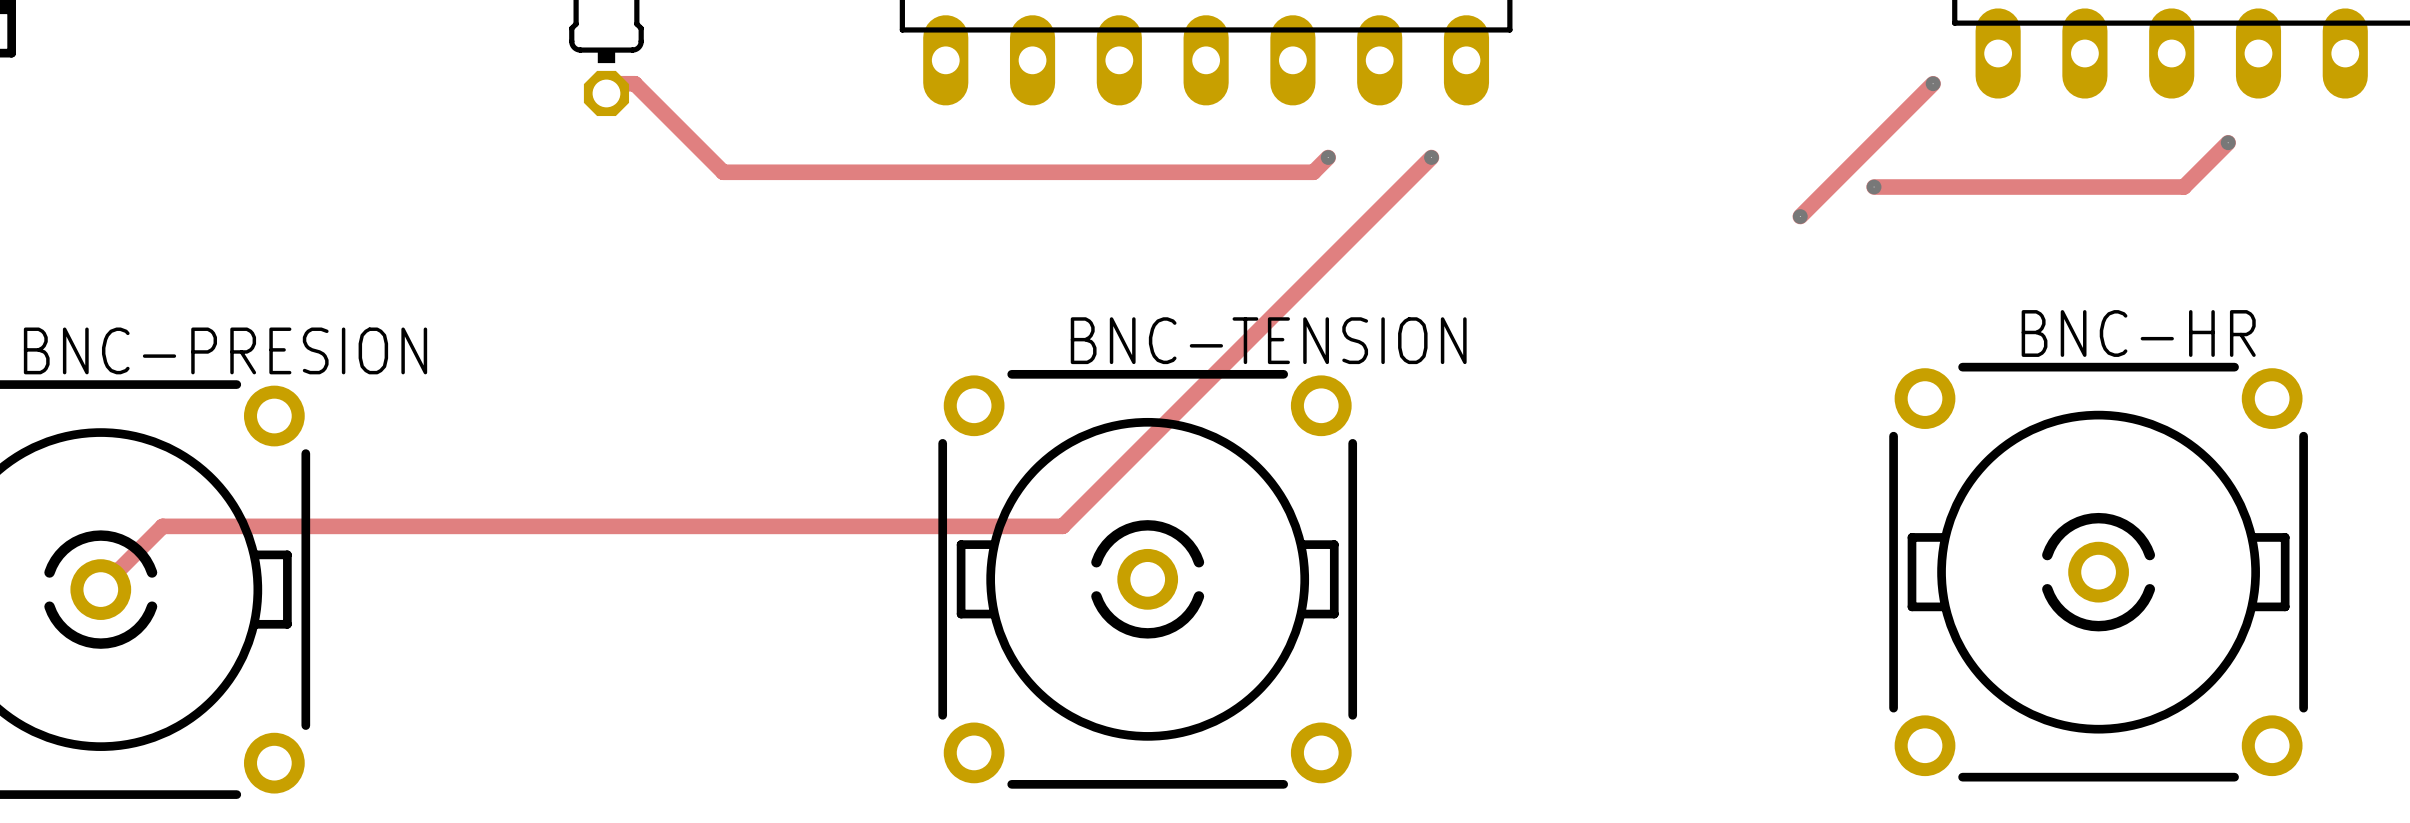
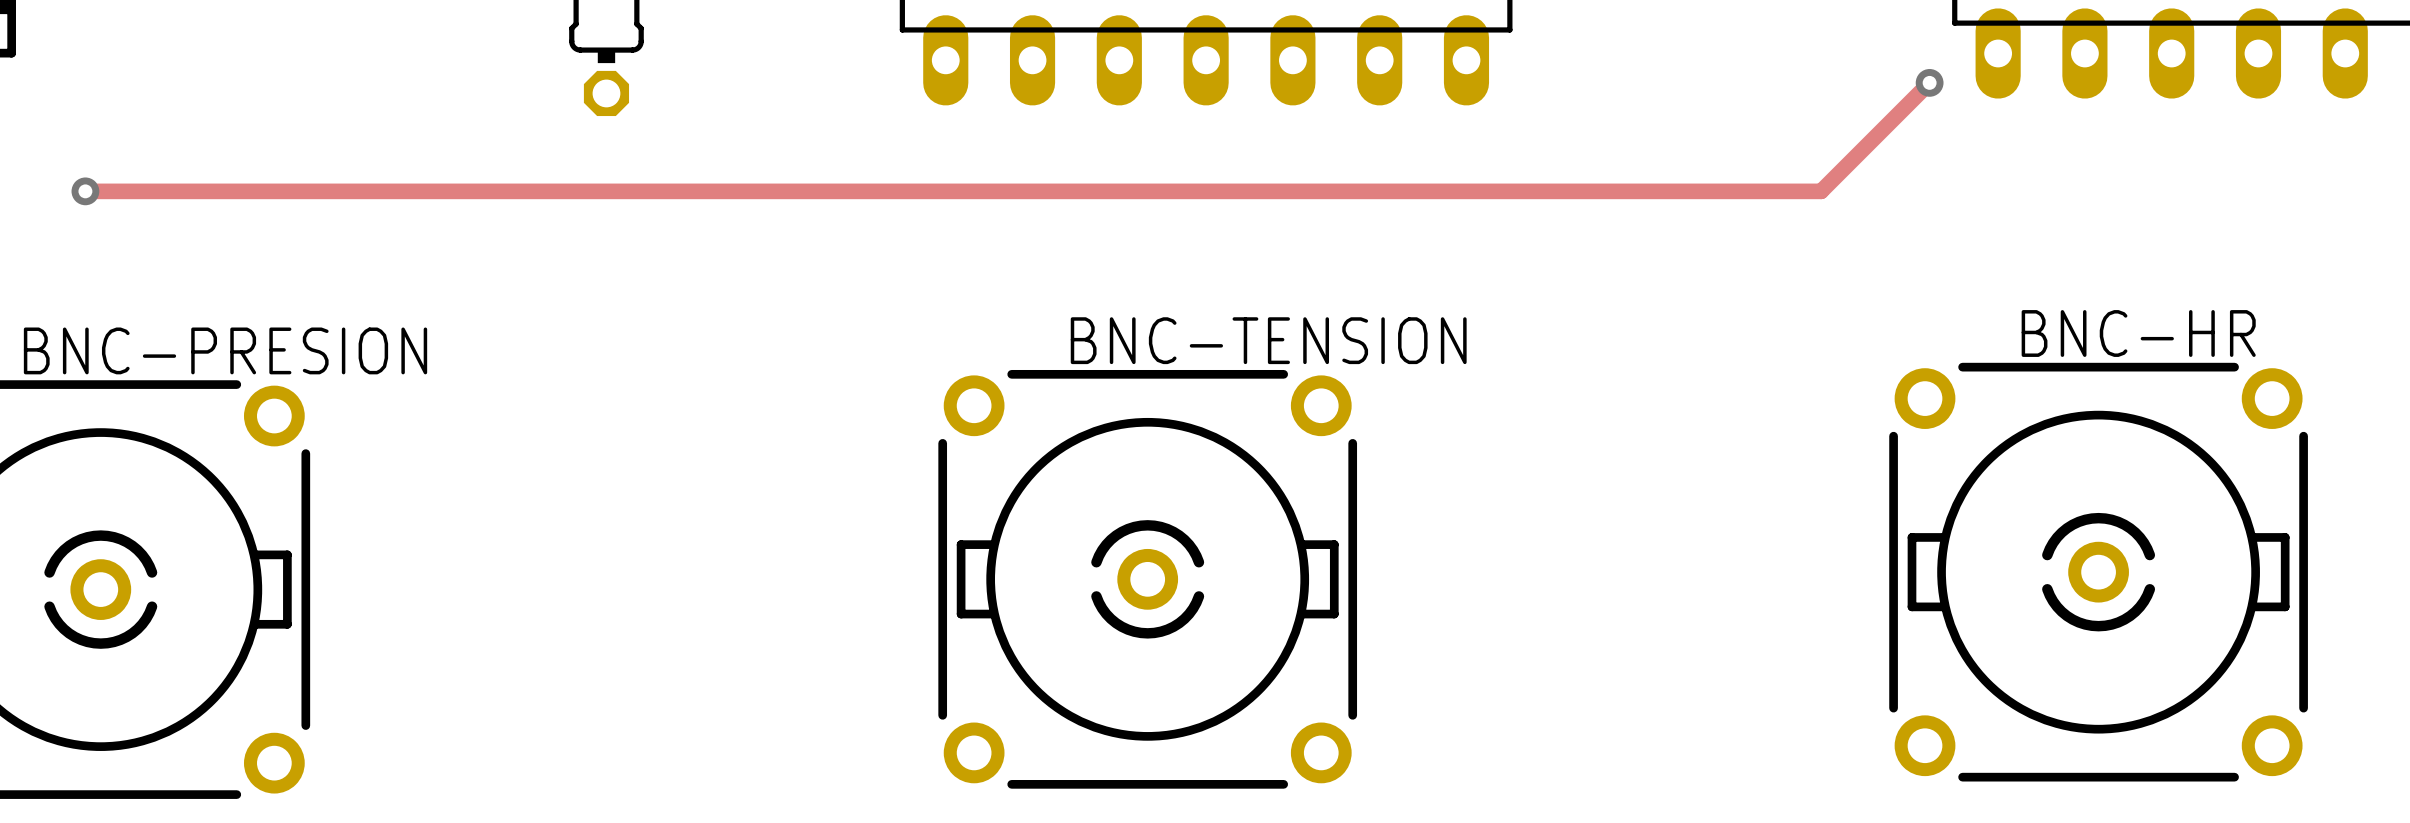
via size: [1925, 76, 1941, 92] -> [1915, 68, 1944, 97]
track: none -> (1929, 82) (1821, 191) (85, 191)
track: (1933, 83) (1800, 216) -> none
track: (606, 93) (620, 83) (634, 83) (723, 172) (1313, 172) (1328, 157) -> none
track: (2228, 142) (2183, 187) (1874, 187) -> none
via: (2228, 142) -> none
via: (1328, 157) -> none
track: (1431, 157) (1062, 526) (162, 526) (118, 570) (103, 570) (88, 585) (100, 589) -> none
via: (1431, 157) -> none
via: (1874, 187) -> none
via: none -> (85, 191)
via: (1800, 216) -> none

